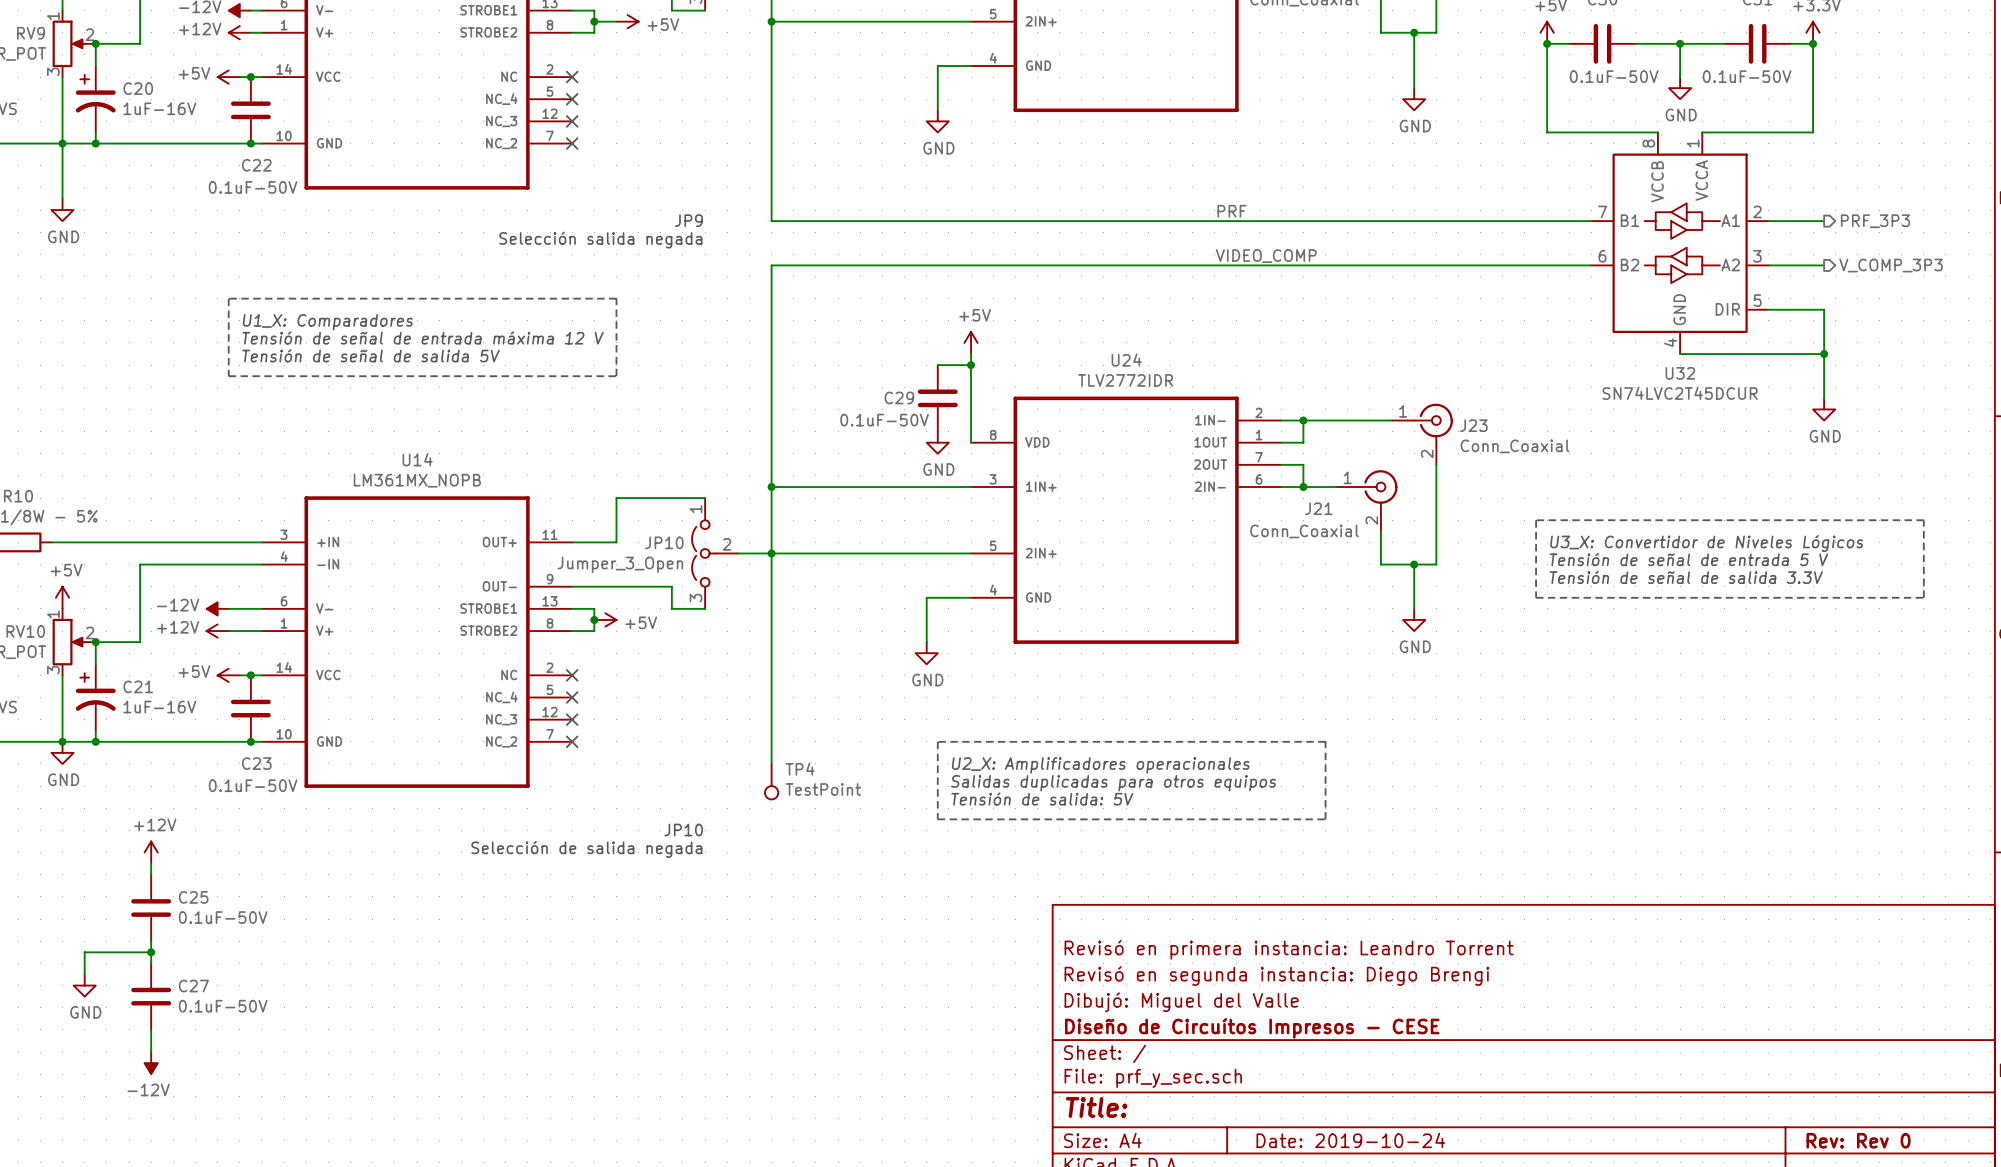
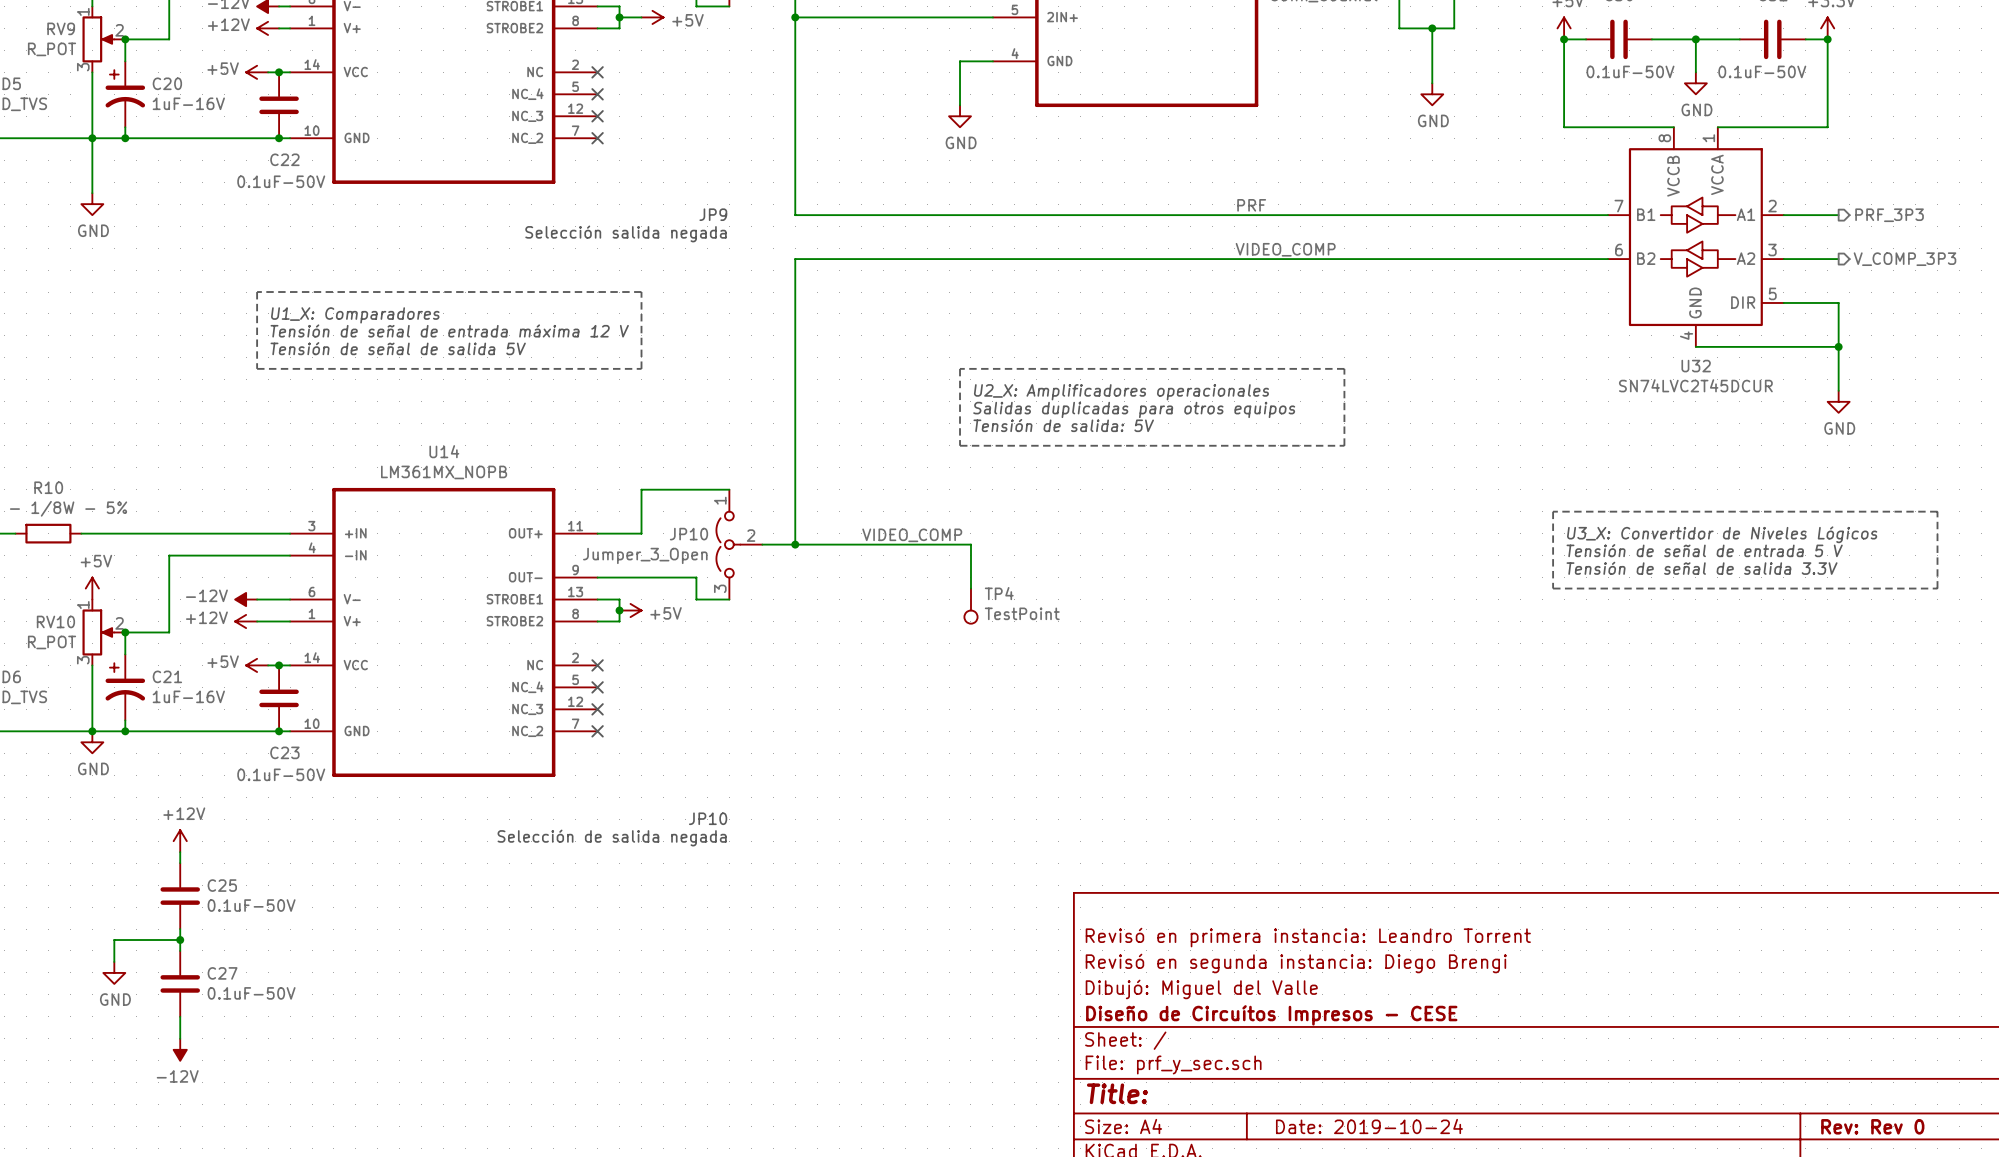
power symbol: +5V (971, 342) -> none
wire: (971, 354) (971, 442) -> none
wire: (937, 365) (971, 365) -> none
junction: (971, 365) -> none
line: none -> (960, 368) (960, 445) (1344, 445) (1344, 368) (960, 368)
C29: 0.1uF-50V (937, 398) -> none
text: none -> U2_X: Amplificadores operacionales (1121, 392)
text: none -> Salidas duplicadas para otros equipos (1134, 409)
wire: (1281, 420) (1392, 420) -> none
wire: (1303, 420) (1303, 442) (1281, 442) -> none
junction: (1303, 420) -> none
text: none -> Tensión de salida: 5V (1063, 425)
J23: Conn_Coaxial (1422, 434) -> none
power symbol: GND (937, 442) -> none
wire: (1281, 464) (1303, 464) (1303, 487) -> none
wire: (1436, 464) (1436, 564) (1380, 564) (1380, 531) -> none
wire: (771, 487) (971, 487) -> none
junction: (771, 487) -> none
wire: (1281, 487) (1336, 487) -> none
junction: (1303, 487) -> none
J21: Conn_Coaxial (1367, 500) -> none
U24: TLV2772IDR (1126, 520) -> none
label: none -> VIDEO_COMP (912, 535)
wire: (771, 553) (771, 763) -> none
wire: (948, 553) (971, 553) -> (970, 544) (970, 588)
wire: (1414, 564) (1414, 608) -> none
junction: (1414, 564) -> none
wire: (971, 597) (926, 597) (926, 642) -> none
power symbol: GND (1414, 619) -> none
power symbol: GND (926, 653) -> none
line: (937, 741) (937, 819) (1325, 819) (1325, 741) (937, 741) -> none
text: U2_X: Amplificadores operacionales (1100, 765) -> none
TP4 position: (771, 781) -> (970, 606)
text: Salidas duplicadas para otros equipos (1113, 783) -> none
text: Tensión de salida: 5V (1042, 798) -> none

